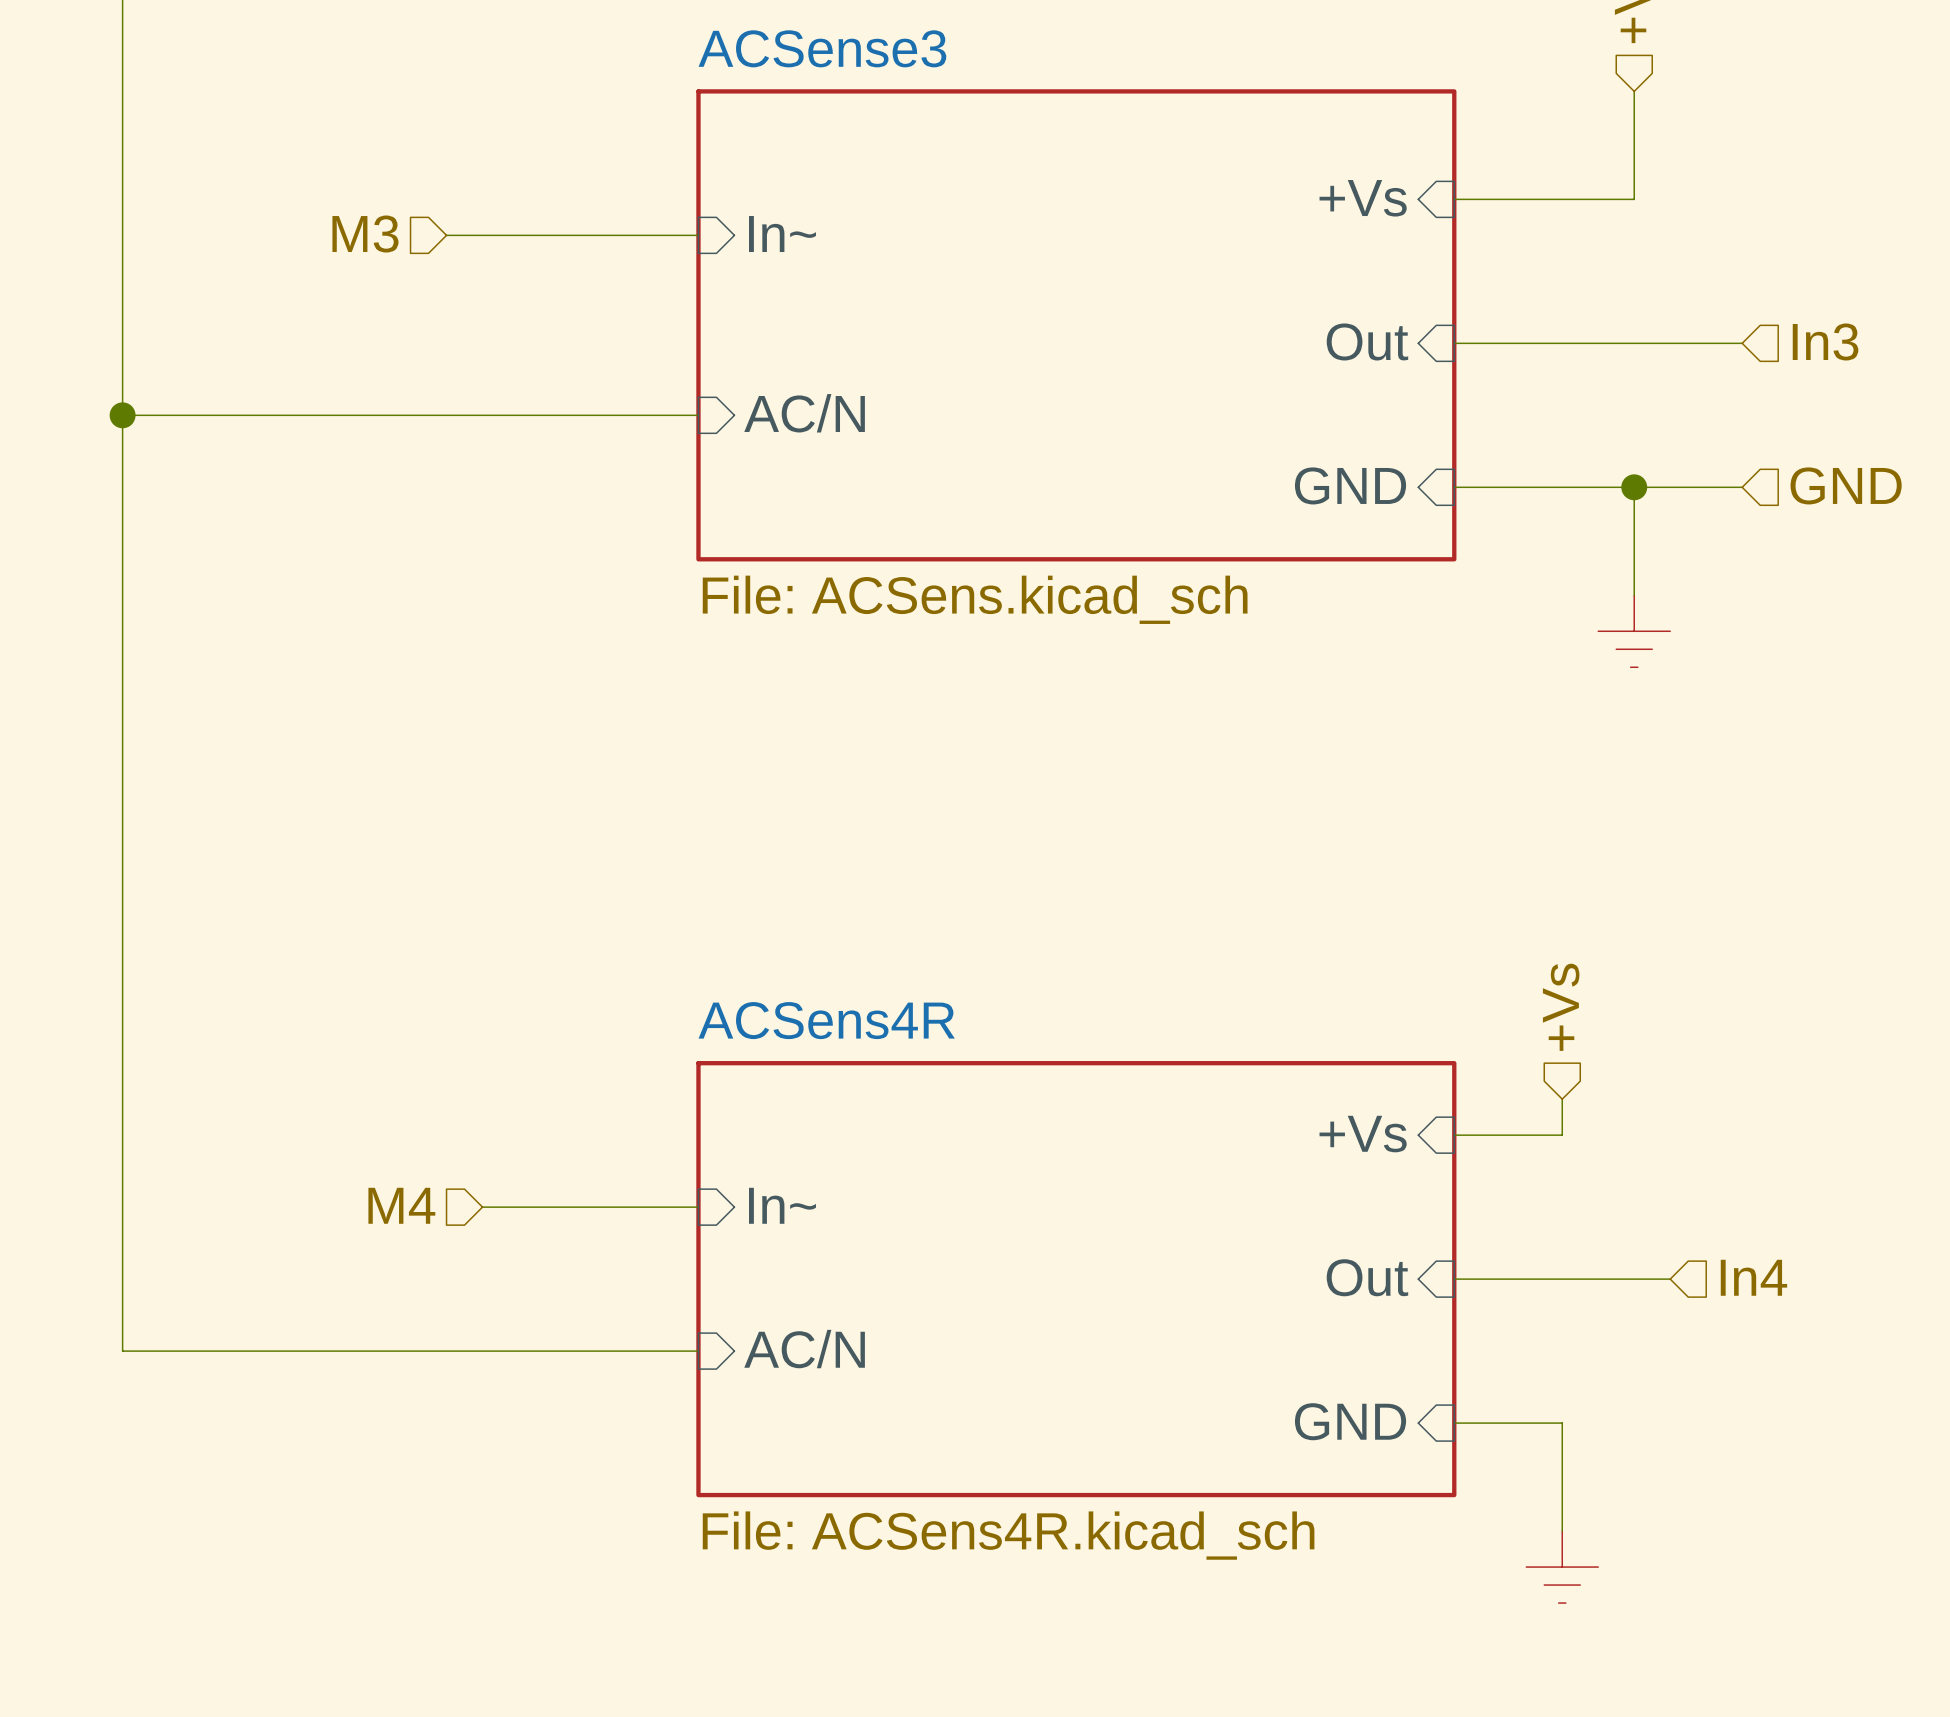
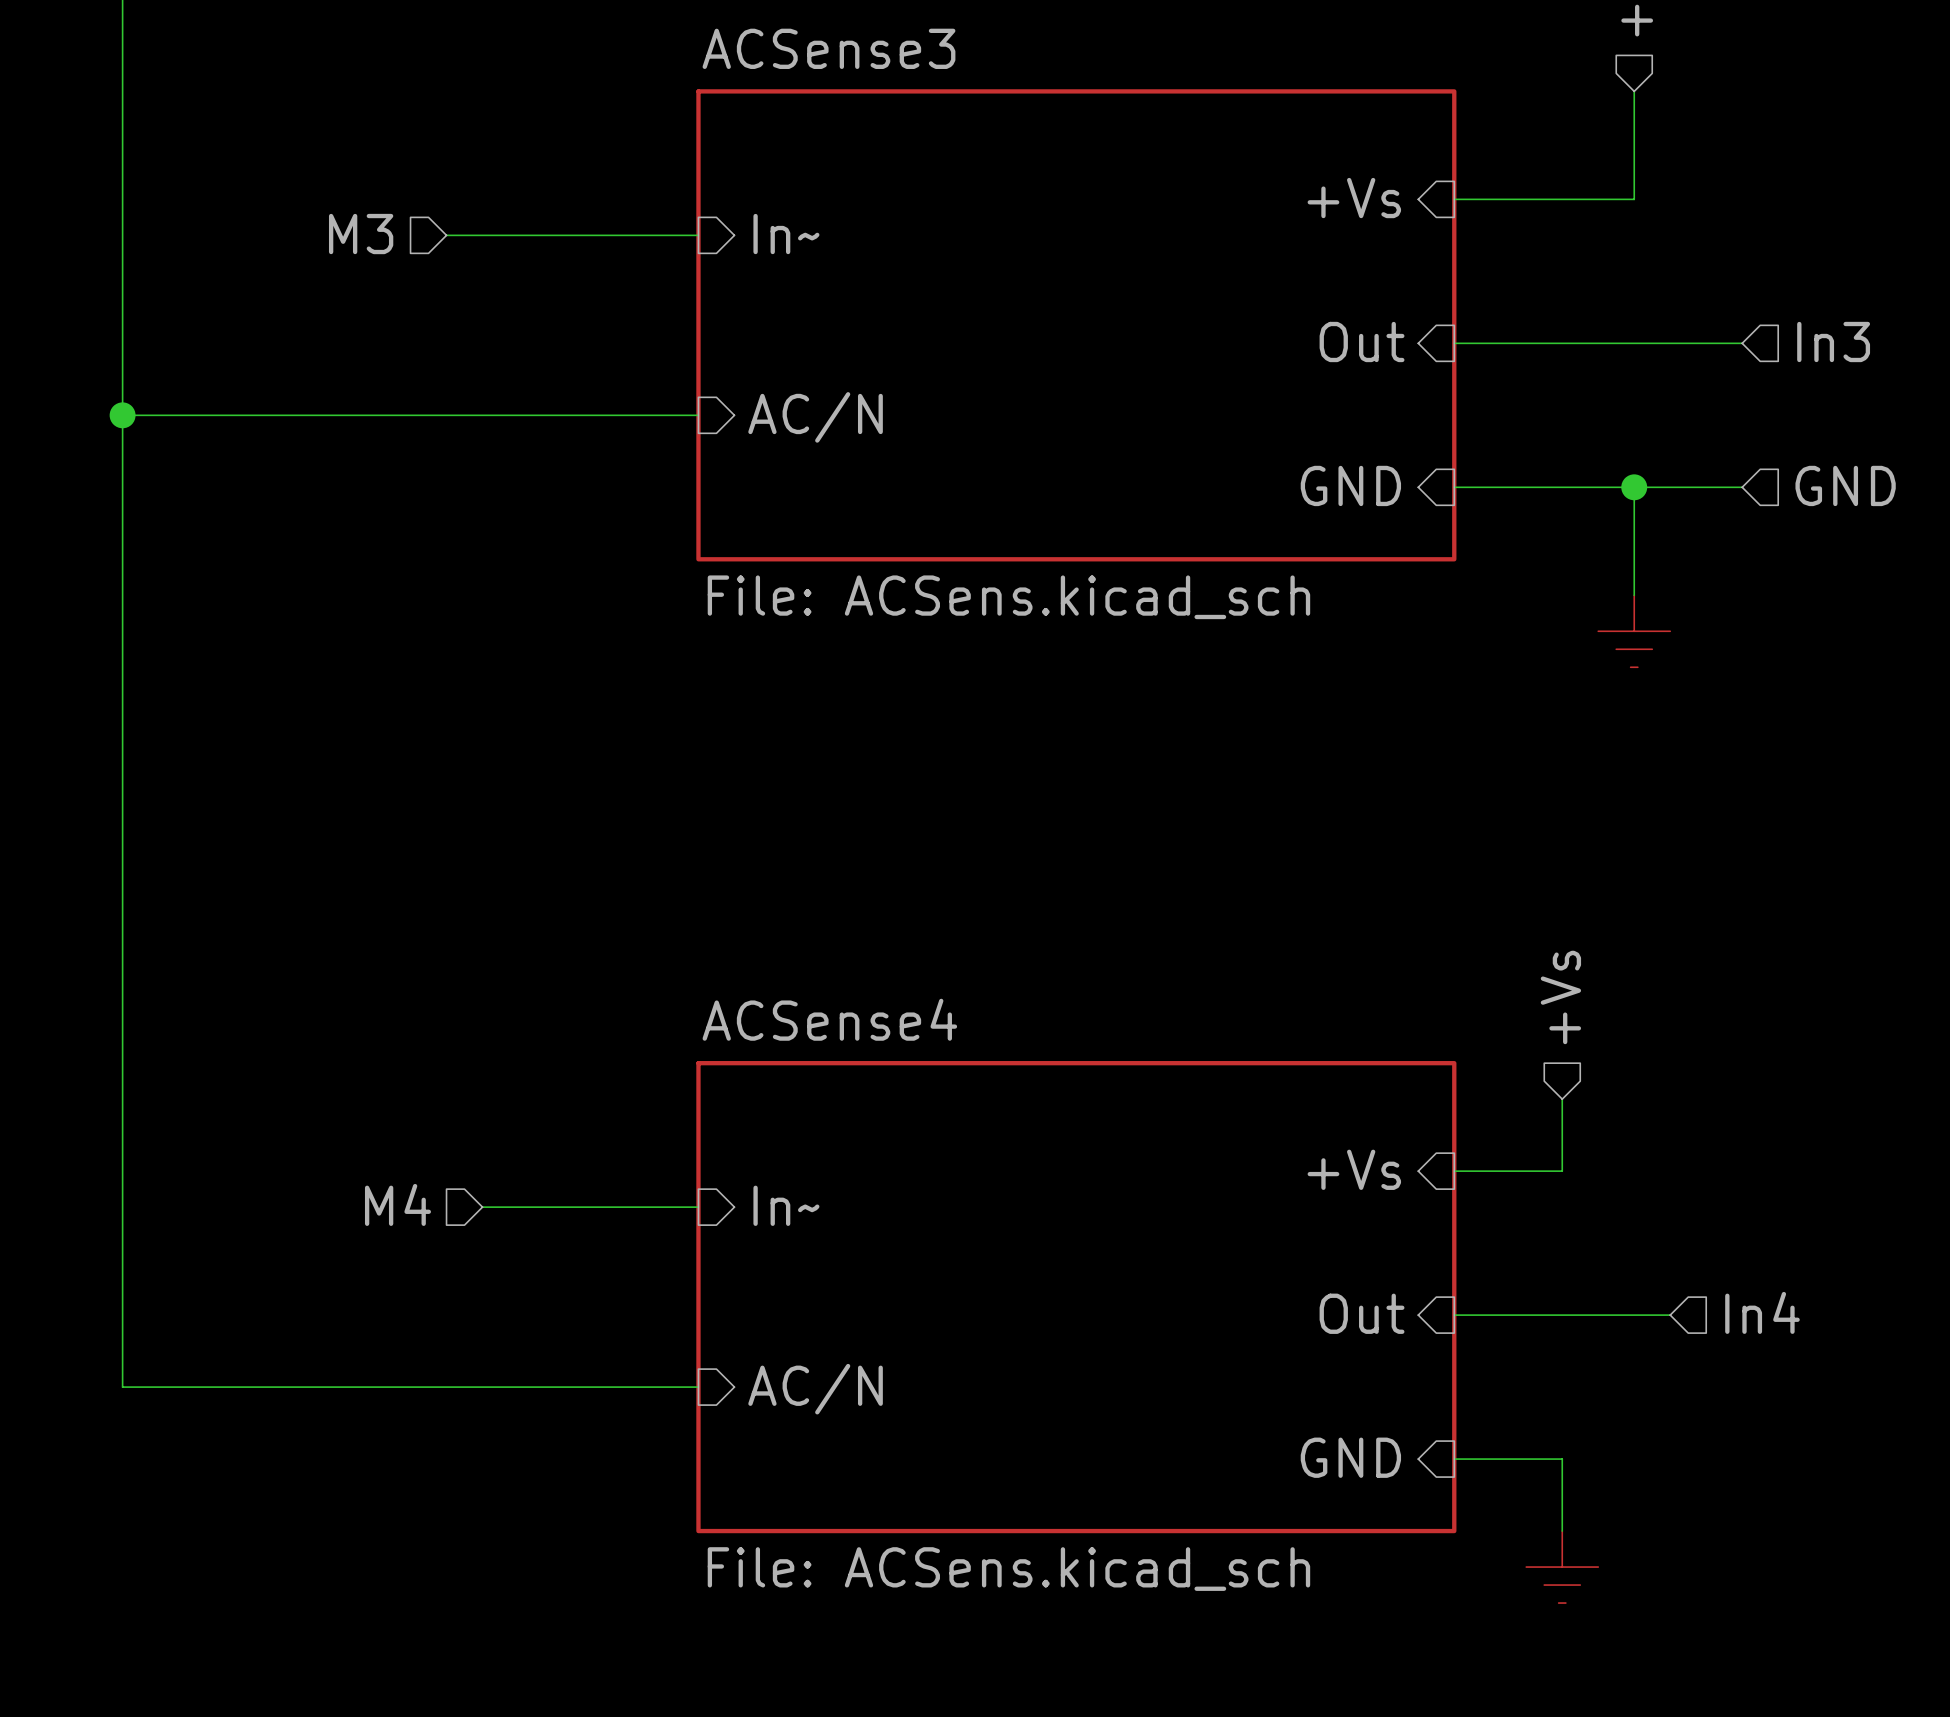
sheet pin position: +Vs (1363, 1134) -> +Vs (1354, 1169)
wire: (1454, 1135) (1562, 1135) -> (1454, 1171) (1562, 1171) (1562, 1135)
sheet pin position: Out (1367, 1277) -> Out (1362, 1313)
hierarchical label position: In4 (1753, 1277) -> In4 (1762, 1312)
sheet ACSens4R: File: ACSens4R.kicad_sch (1076, 1279) -> none
wire: (1454, 1279) (1670, 1279) -> (1454, 1315) (1670, 1315)
sheet ACSense4: none -> File: ACSens.kicad_sch (1076, 1297)
sheet pin position: AC/N (804, 1349) -> AC/N (815, 1389)
wire: (122, 1351) (698, 1351) -> (122, 1351) (122, 1387) (698, 1387)
sheet pin position: GND (1350, 1421) -> GND (1350, 1457)
wire: (1454, 1423) (1562, 1423) (1562, 1459) -> (1454, 1459) (1562, 1459)

